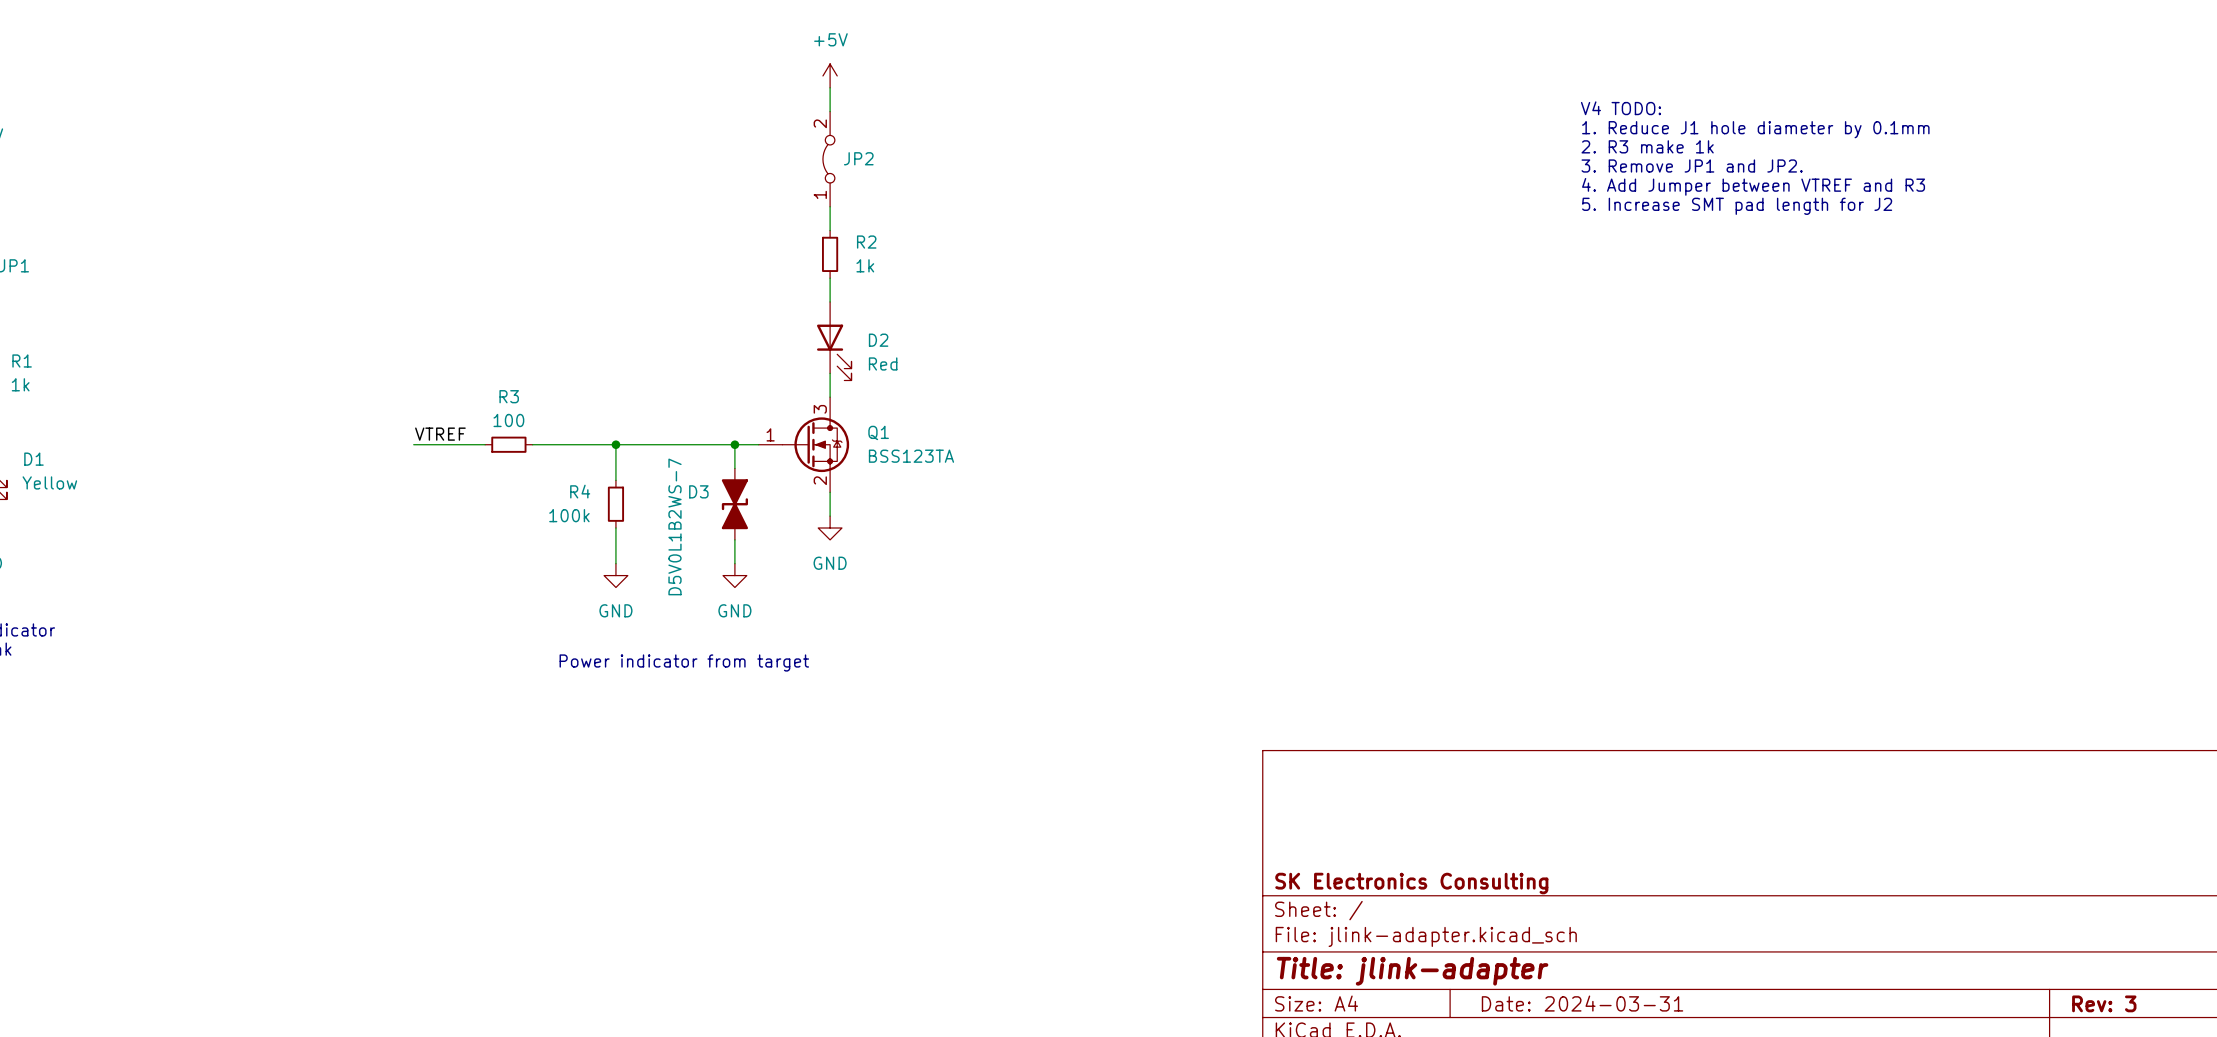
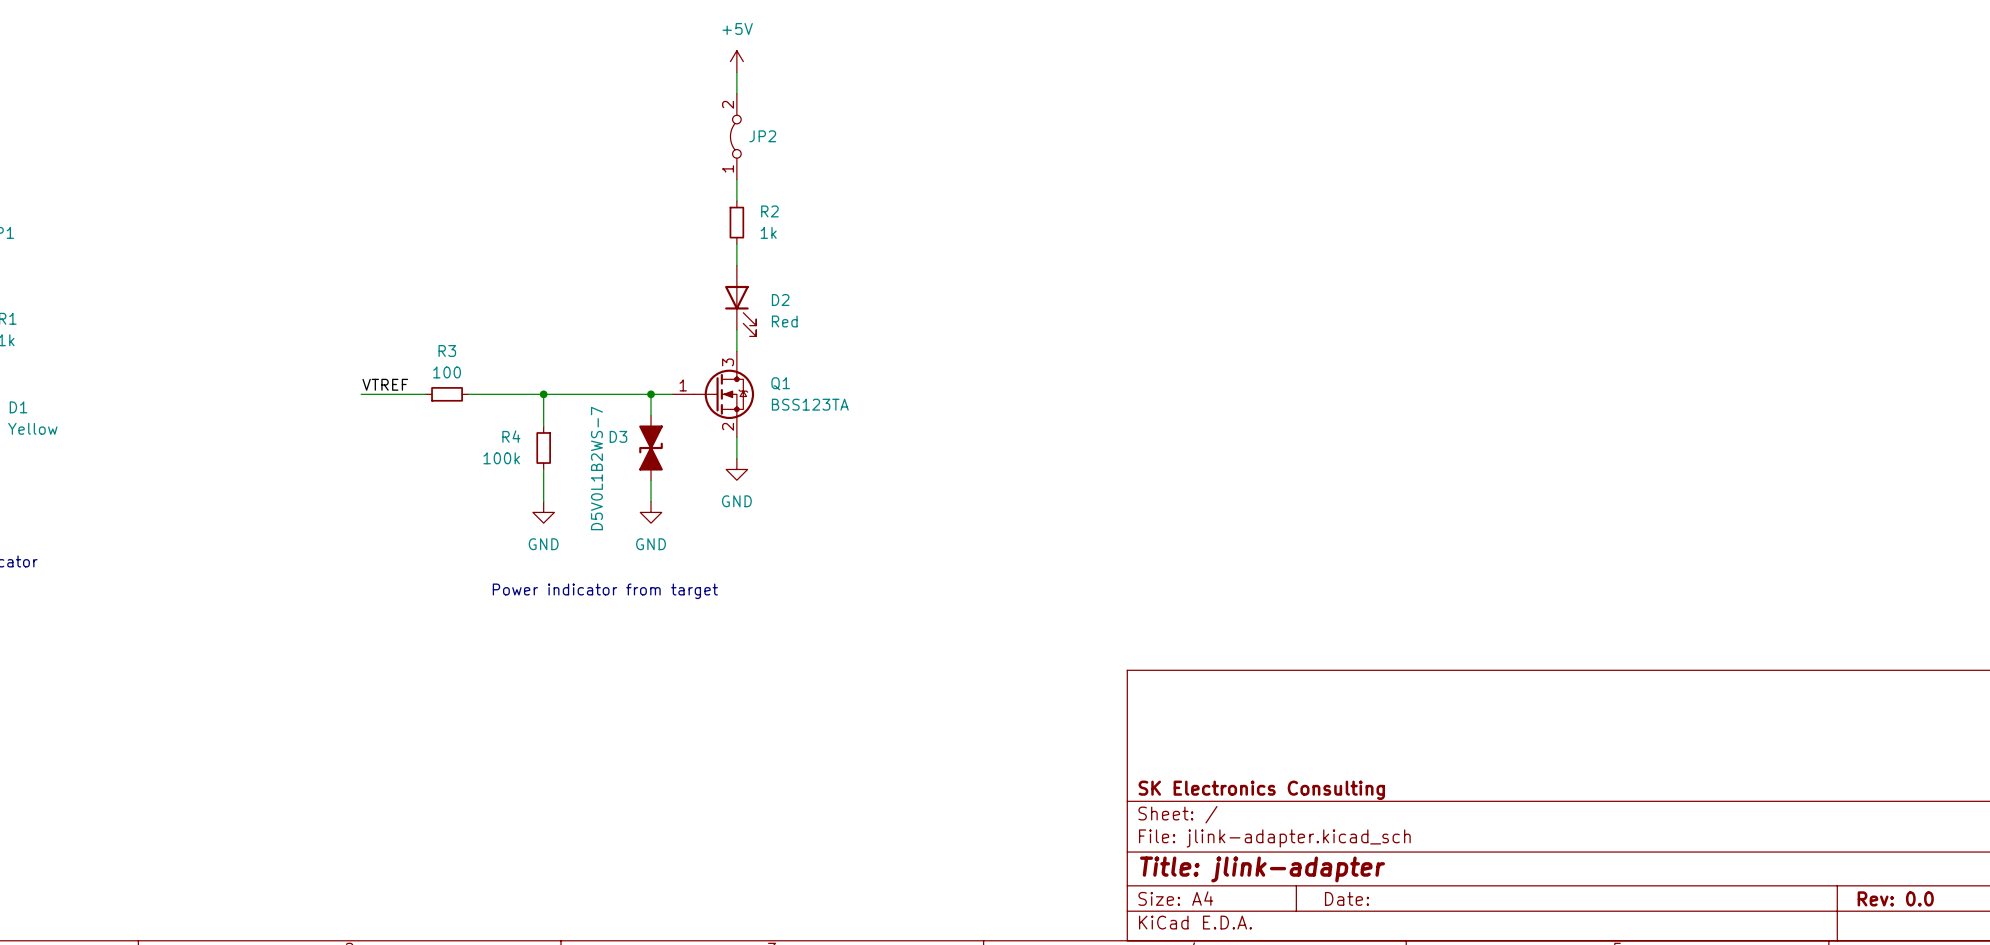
text: V4 TODO: (1620, 108) -> none
text: 1. Reduce J1 hole diameter by 0.1mm (1755, 129) -> none
text: 2. R3 make 1k (1647, 146) -> none
text: 3. Remove JP1 and JP2. (1692, 166) -> none
text: 4. Add Jumper between VTREF and R3 (1753, 186) -> none
text: 5. Increase SMT pad length for J2 (1737, 206) -> none
title block: Date: 2024-03-31 (1582, 1003) -> Date: (1347, 898)
title block: Rev: 3 (2104, 1003) -> Rev: 0.0 (1895, 898)

